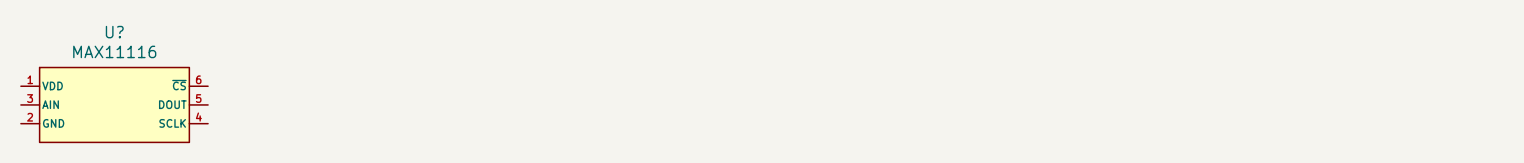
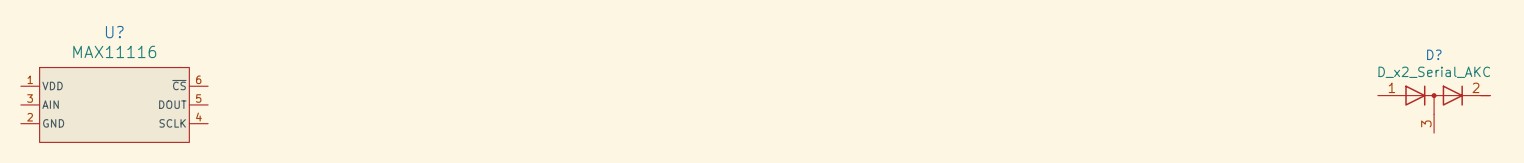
D?: none -> D_x2_Serial_AKC (1434, 109)

